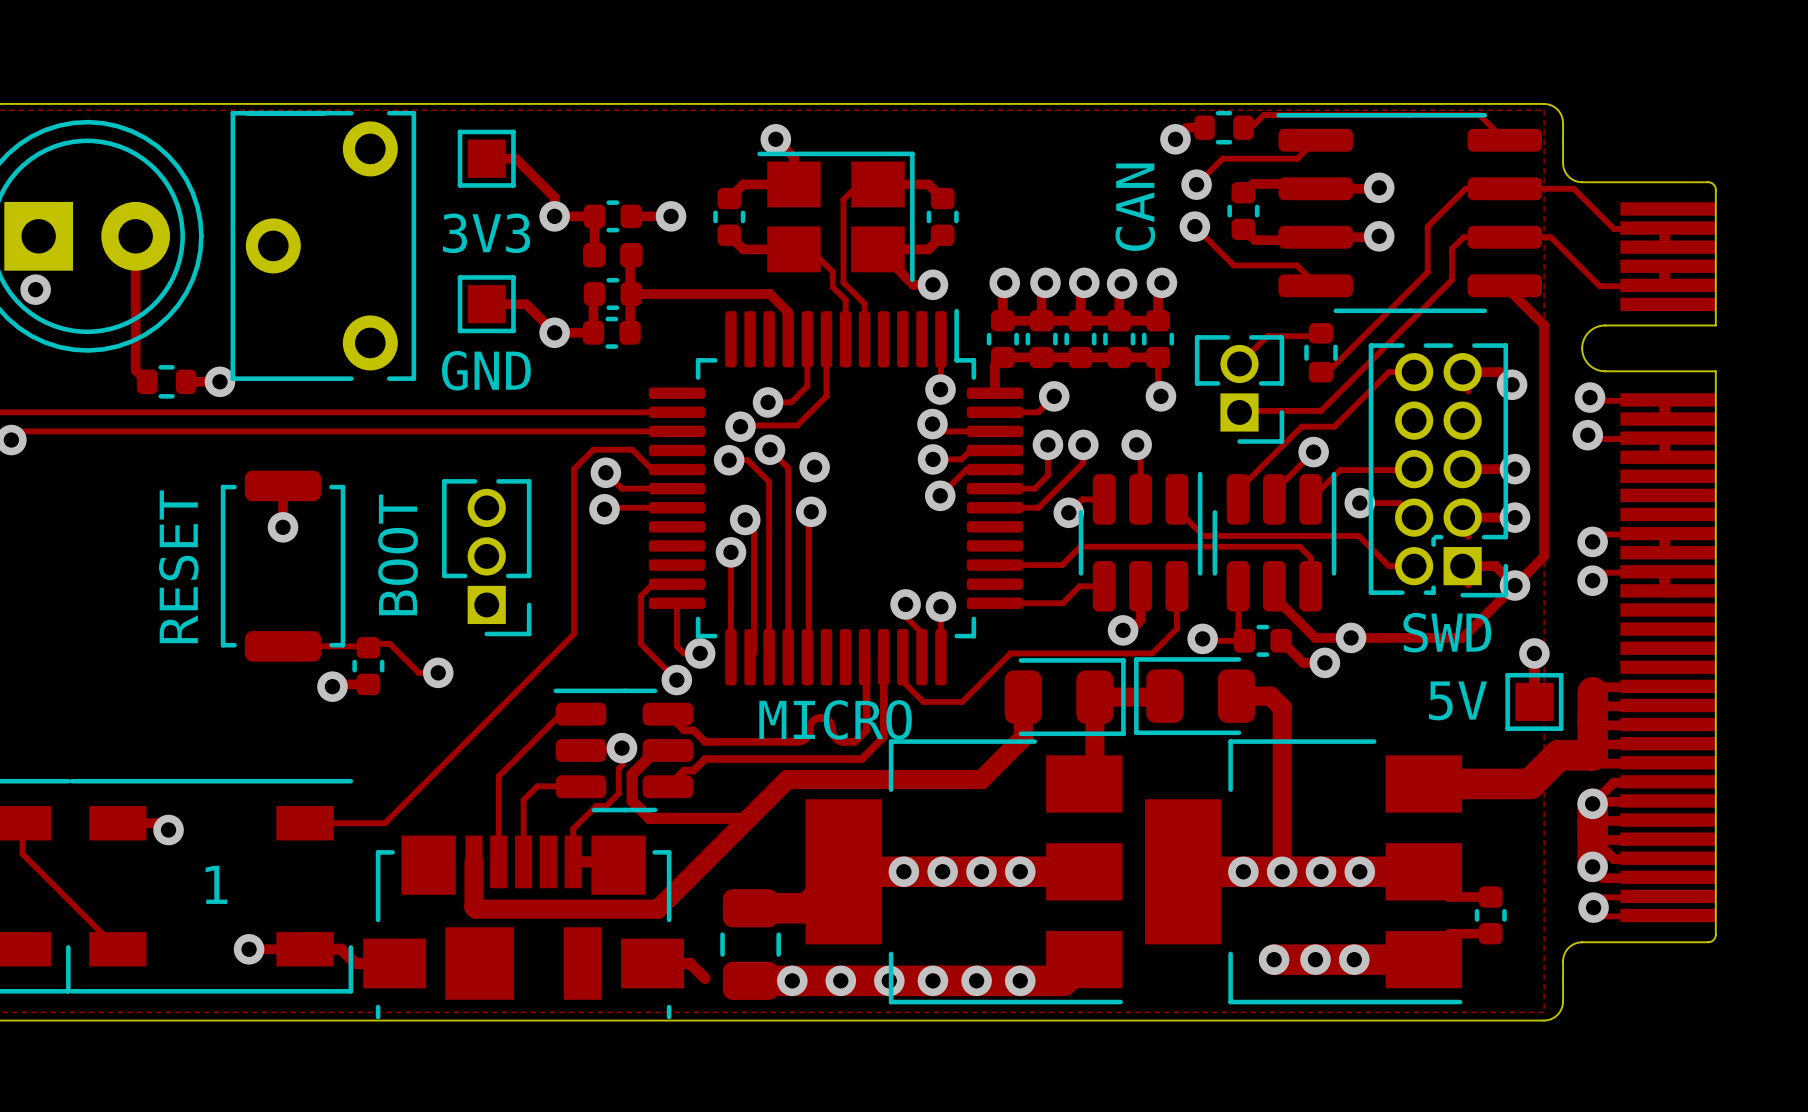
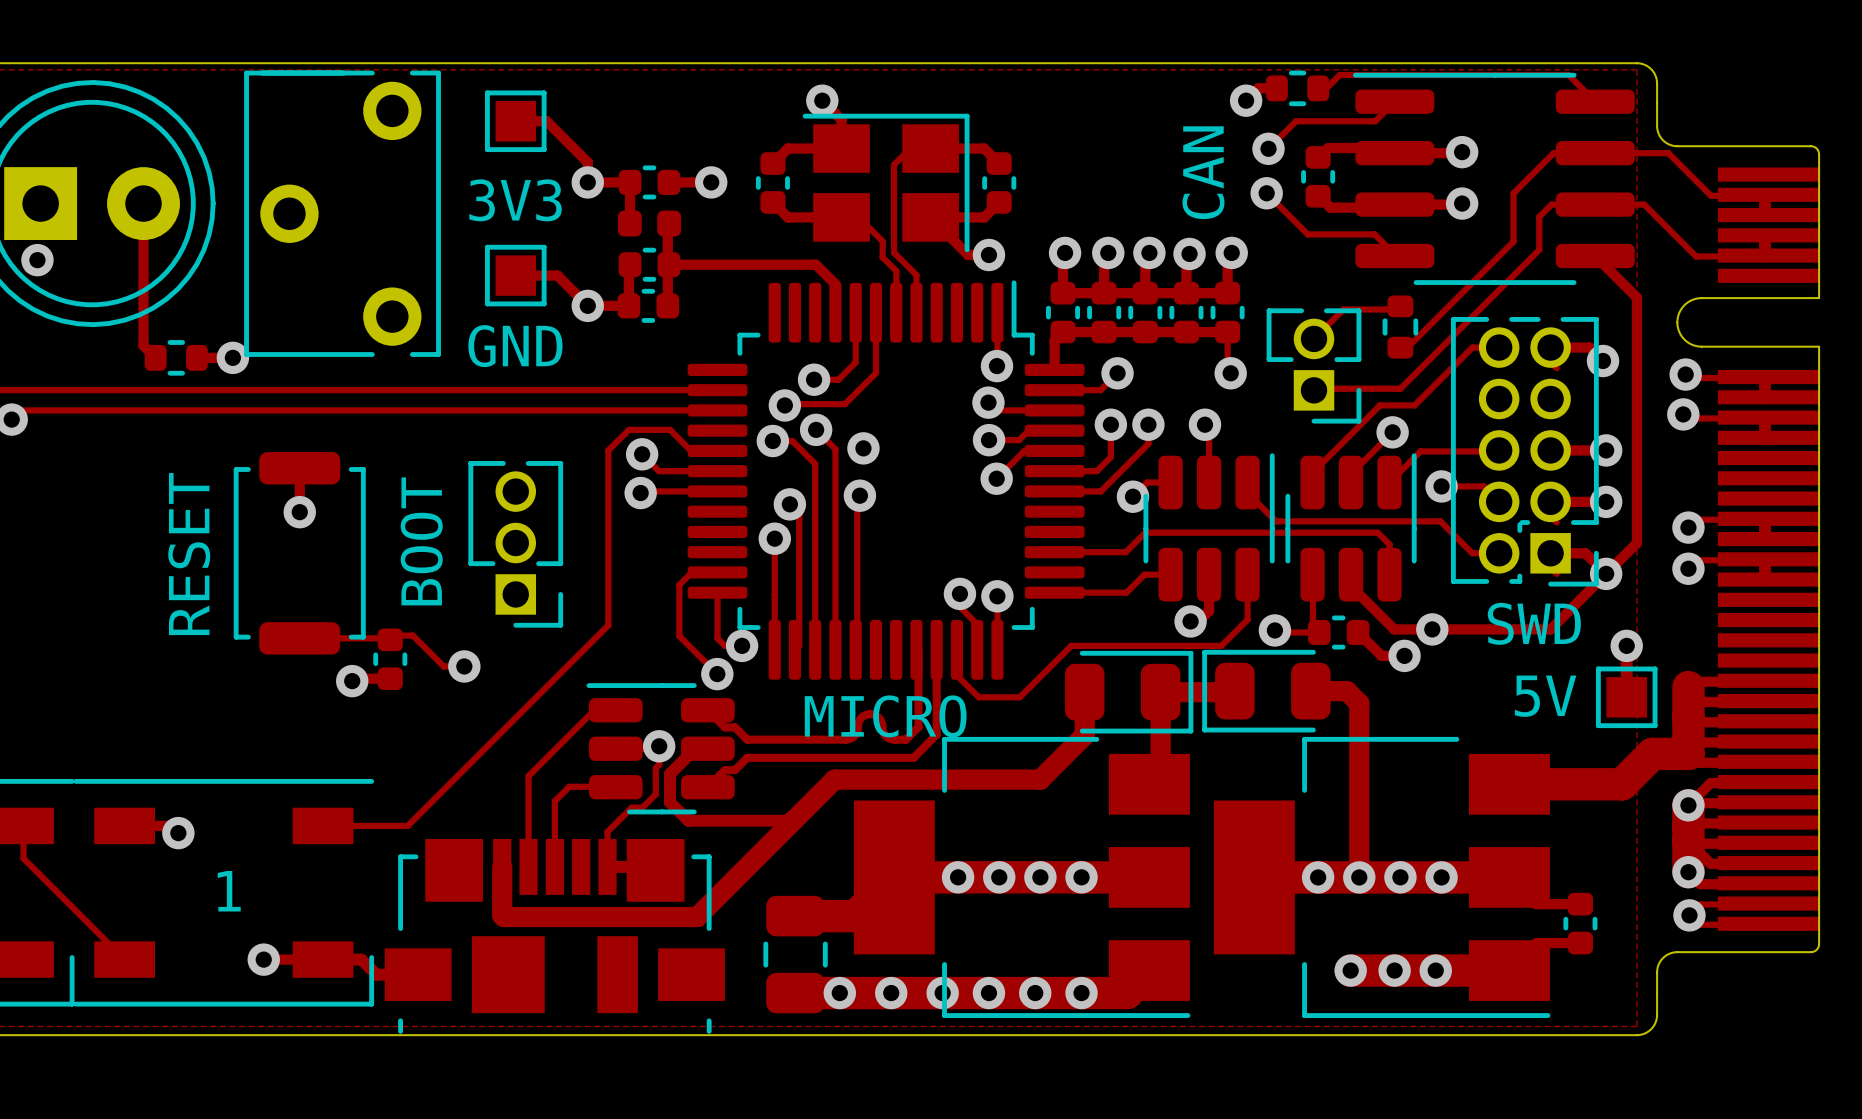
track: (652, 963) (690, 963) (705, 978) -> none

